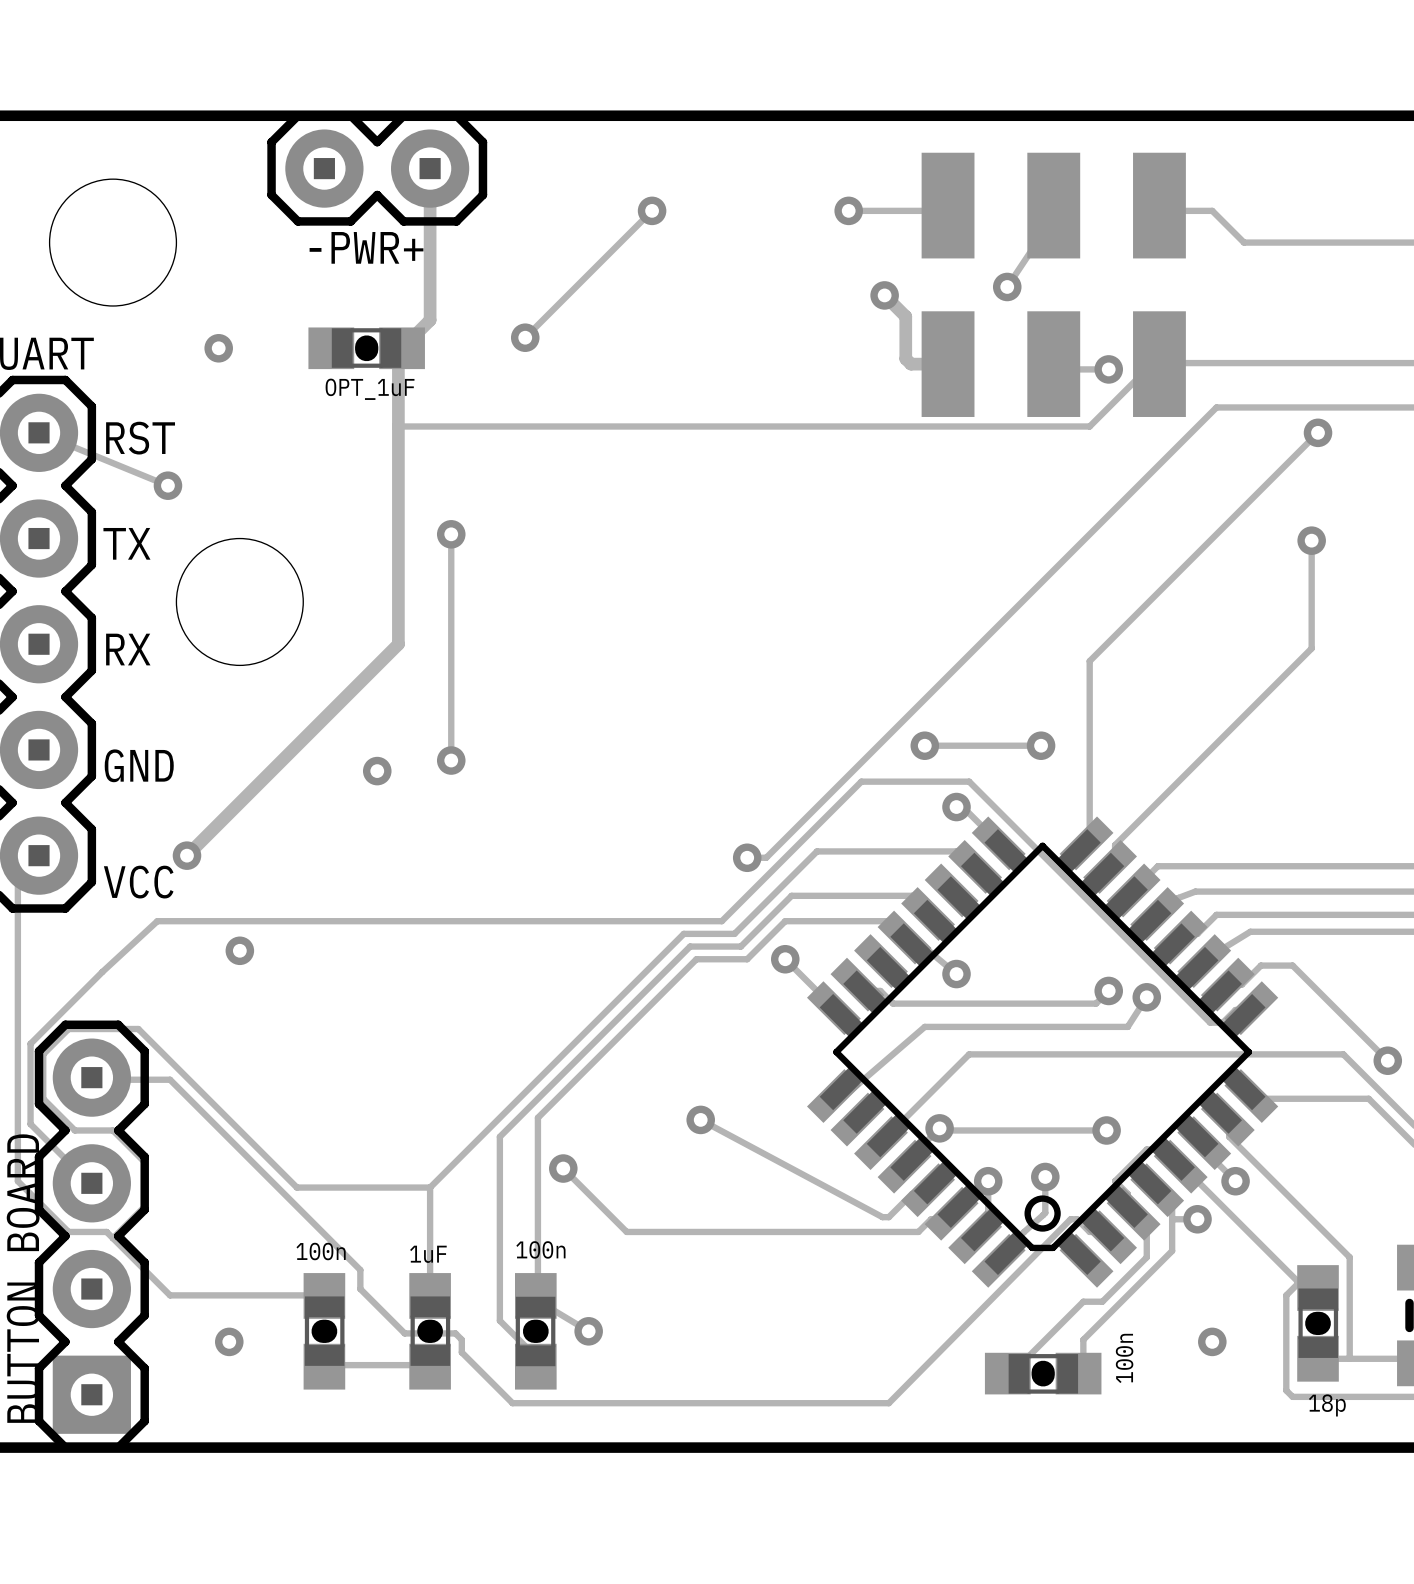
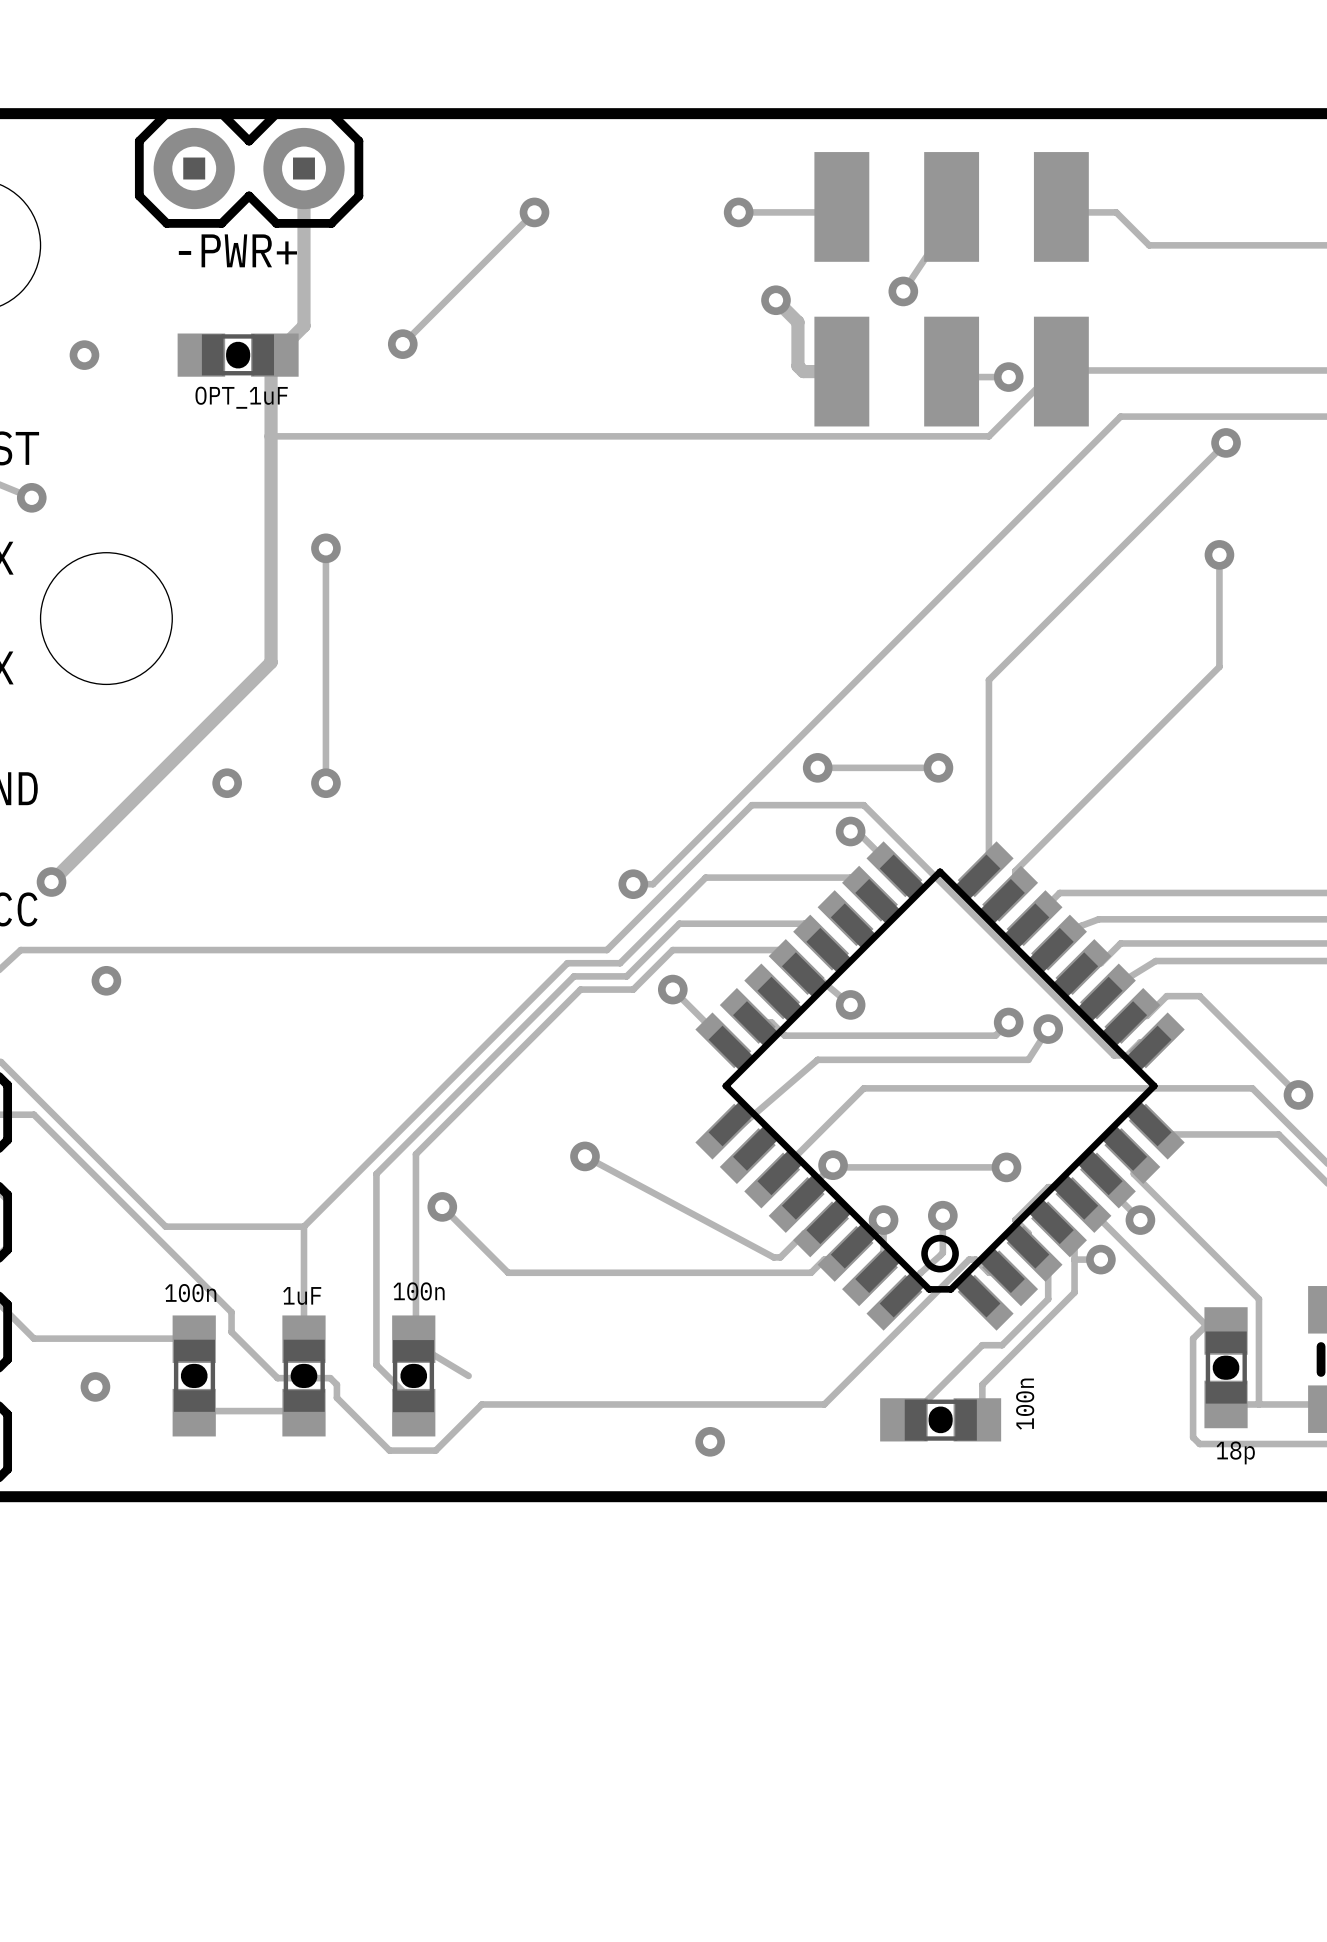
via position: (377, 771) -> (227, 783)
track: (1070, 1219) (888, 1403) (556, 1403) -> (969, 1259) (824, 1404) (481, 1404) (435, 1450)
via: (588, 1331) -> none
via: (1212, 1341) -> none
via: none -> (710, 1441)

